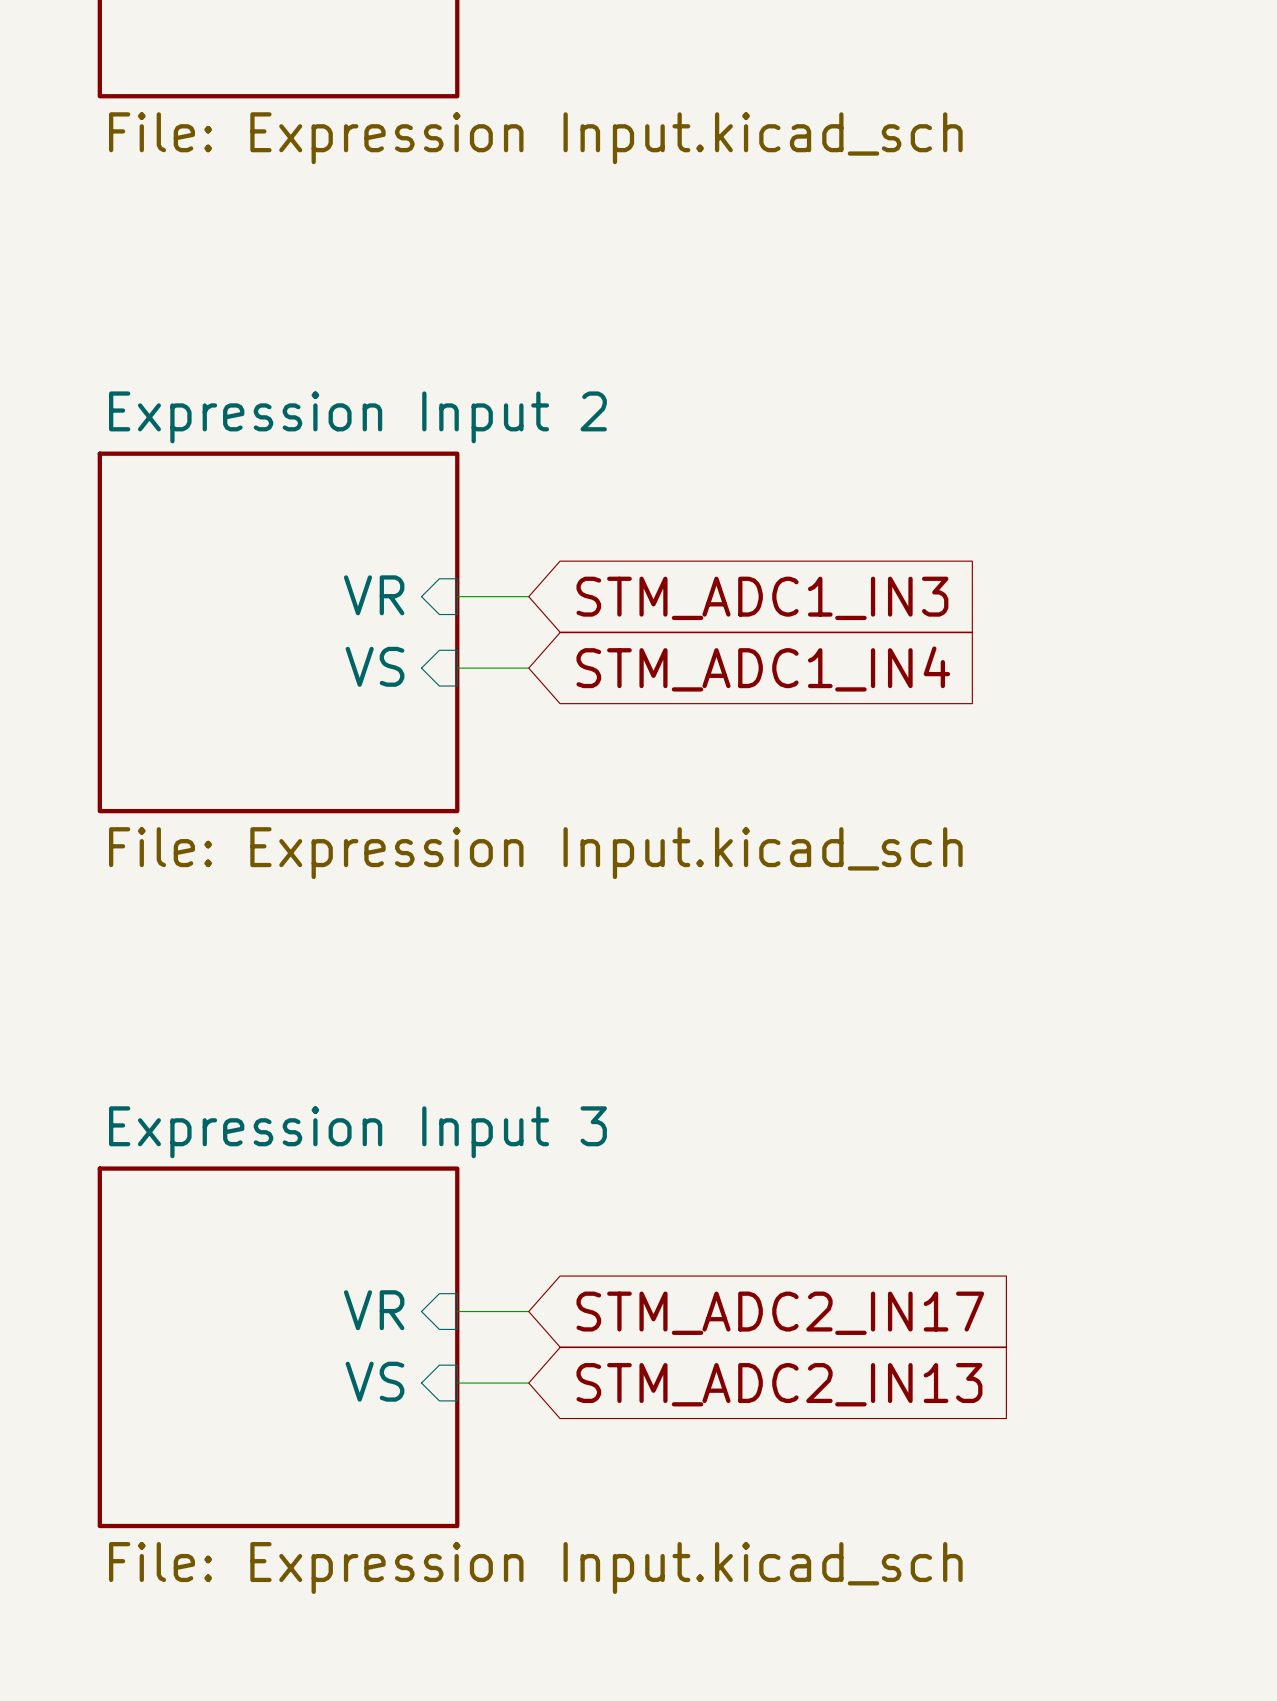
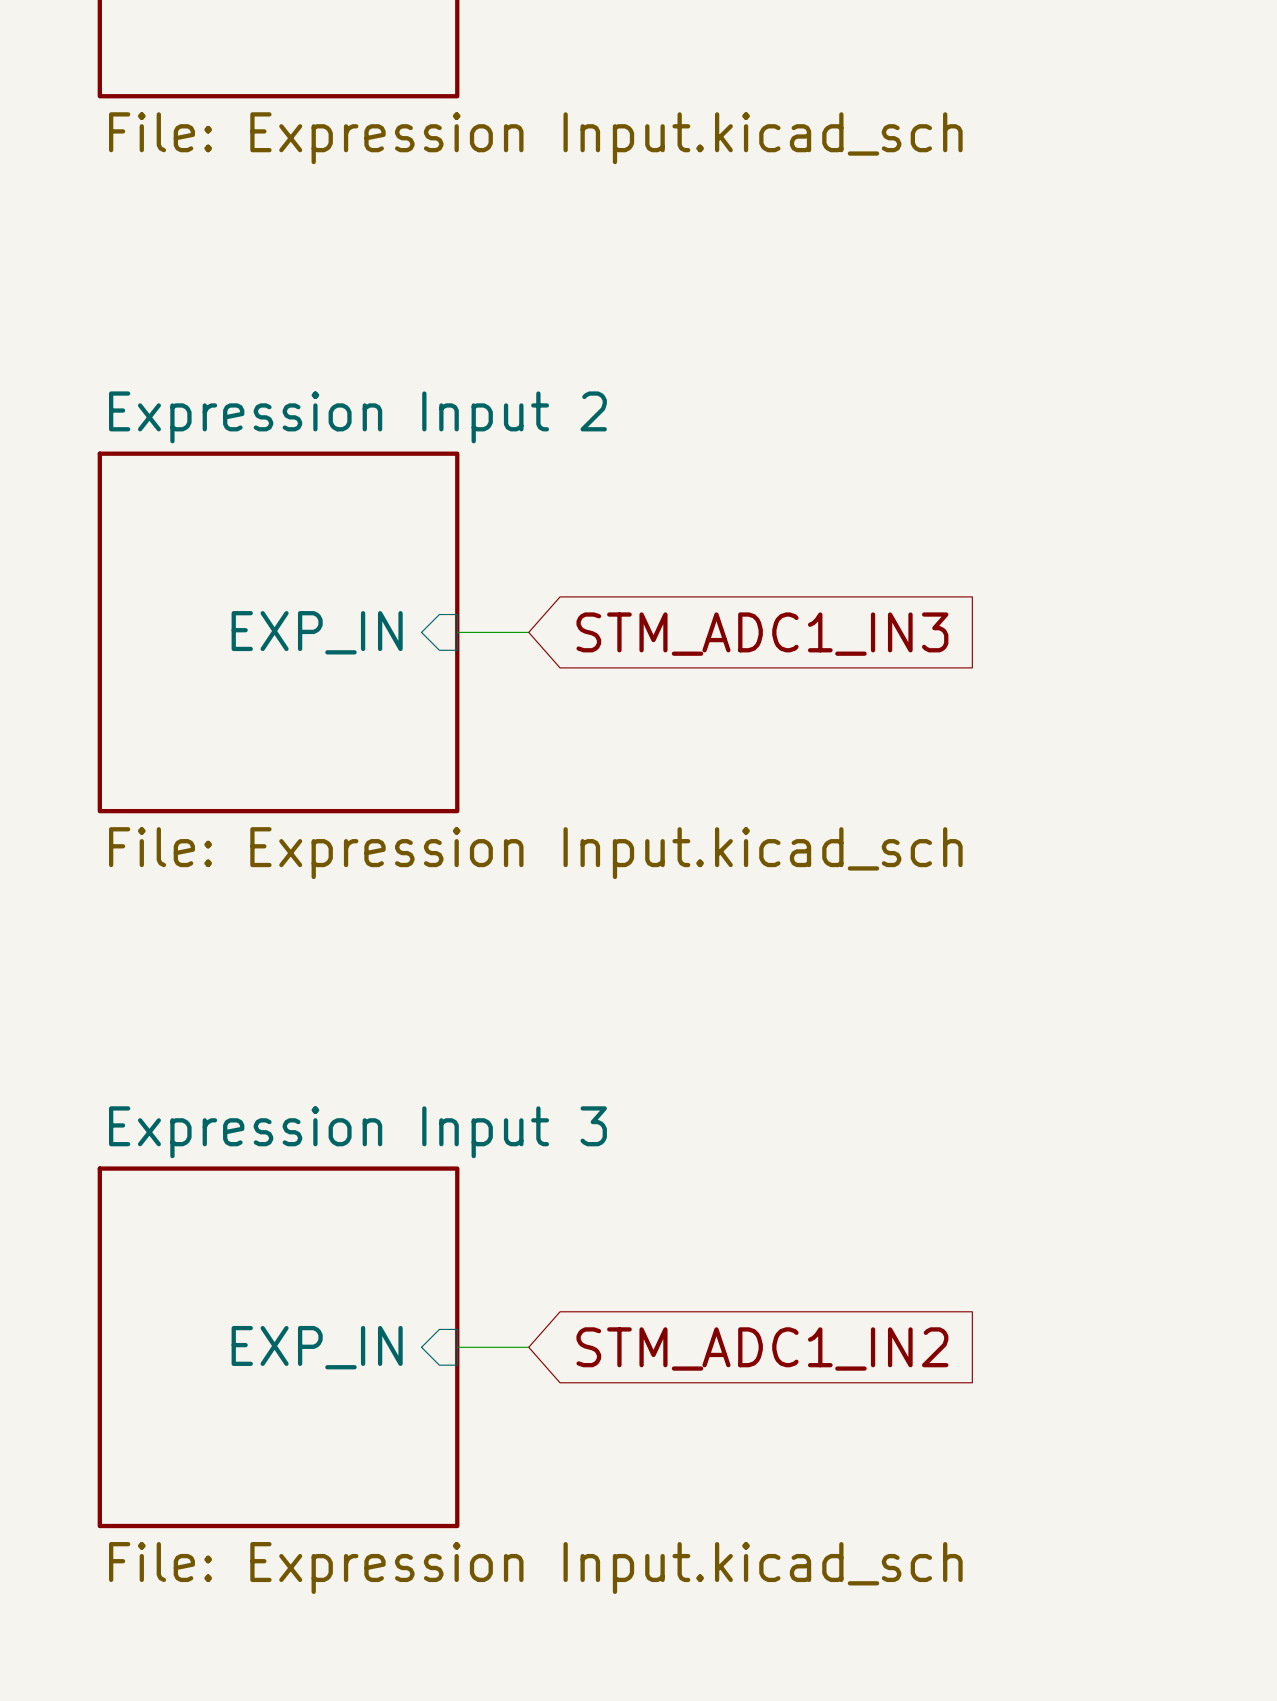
sheet pin: VR (374, 595) -> none
wire: (457, 596) (528, 596) -> (457, 632) (528, 632)
global label position: STM_ADC1_IN3 (762, 598) -> STM_ADC1_IN3 (762, 634)
sheet pin: none -> EXP_IN (317, 632)
sheet pin: VS (375, 666) -> none
wire: (457, 668) (528, 668) -> none
global label: STM_ADC1_IN4 (763, 669) -> none
sheet pin: VR (374, 1310) -> none
wire: (457, 1311) (528, 1311) -> (457, 1347) (528, 1347)
global label: STM_ADC2_IN17 (780, 1313) -> none
sheet pin: none -> EXP_IN (317, 1347)
global label: none -> STM_ADC1_IN2 (762, 1348)
sheet pin: VS (375, 1381) -> none
wire: (457, 1383) (528, 1383) -> none
global label: STM_ADC2_IN13 (779, 1384) -> none

